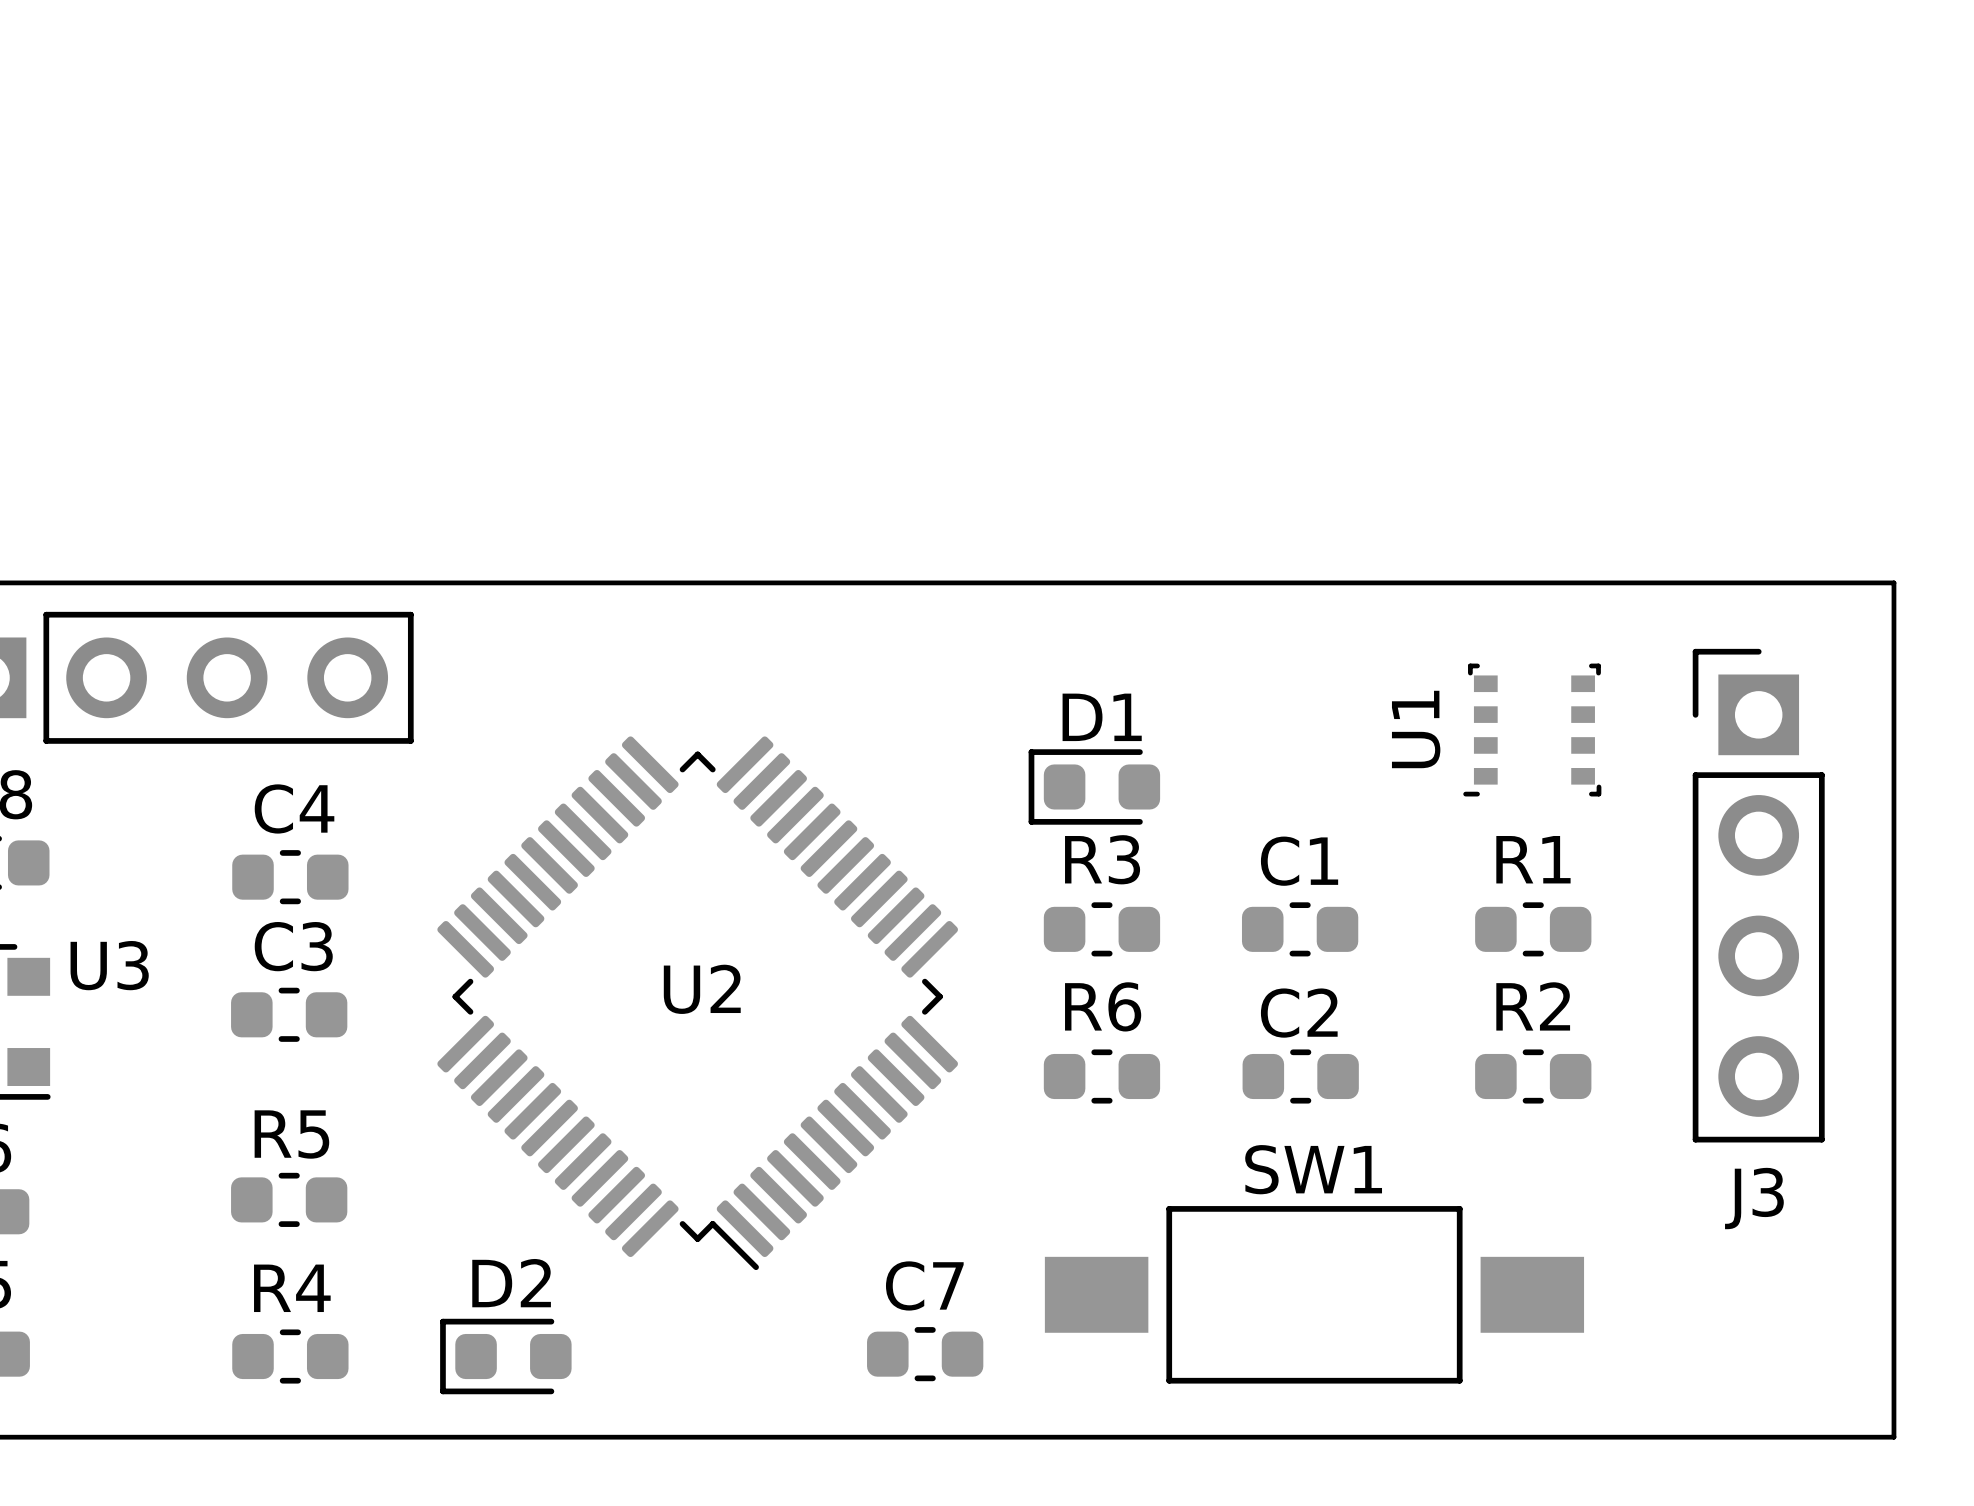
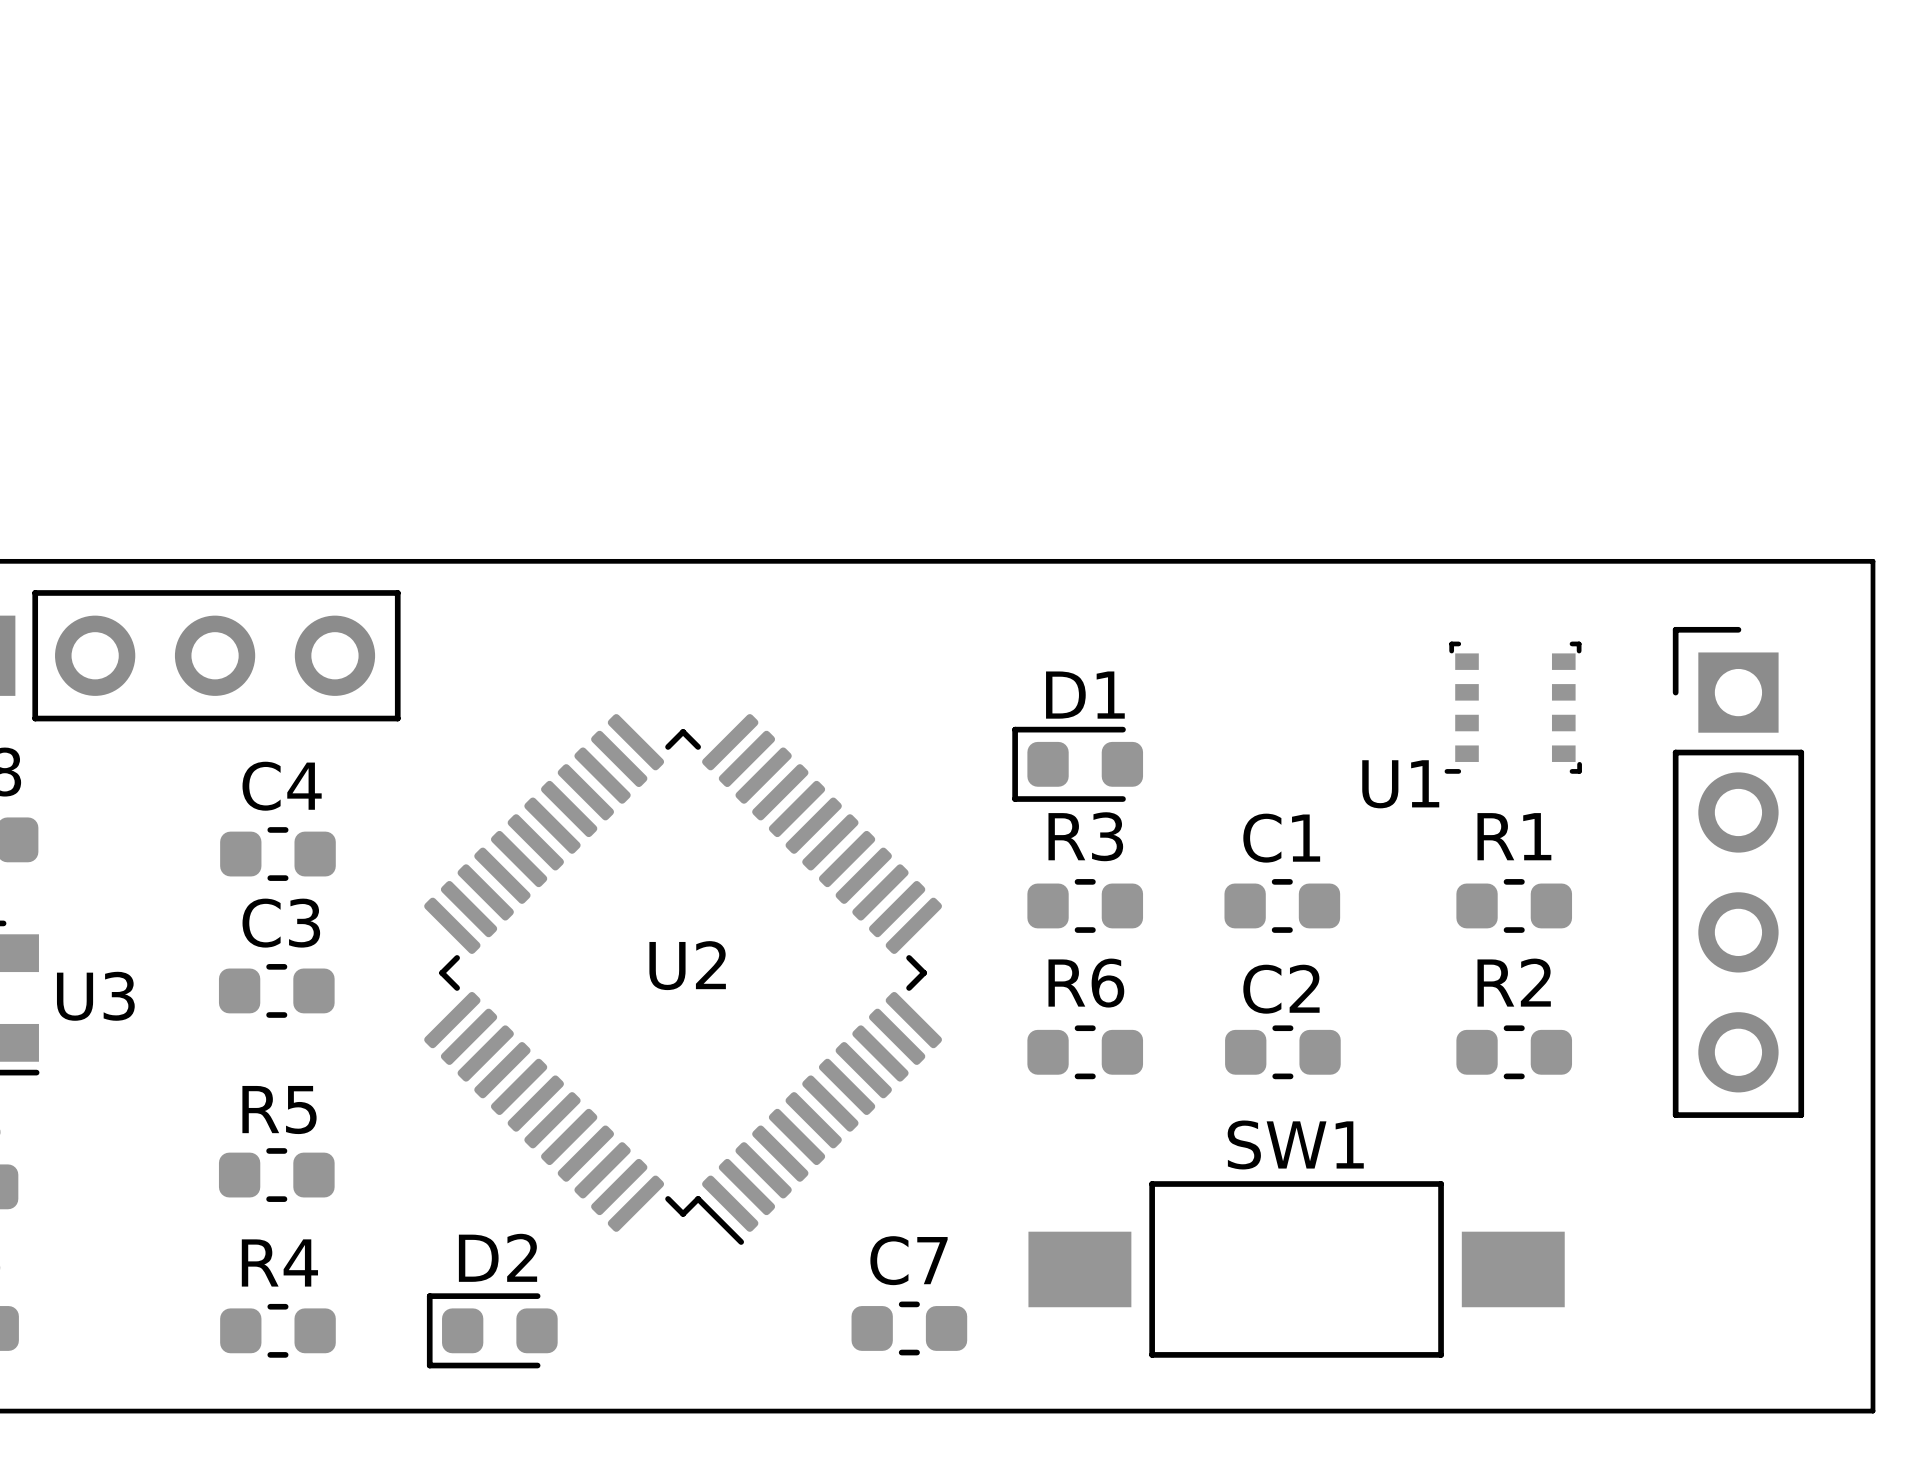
U1 name rotation: 0° (1416, 729) -> 90° clockwise (1400, 784)
U3 name position: U3 (109, 965) -> U3 (95, 996)
J3 name: J3 (1754, 1198) -> none

